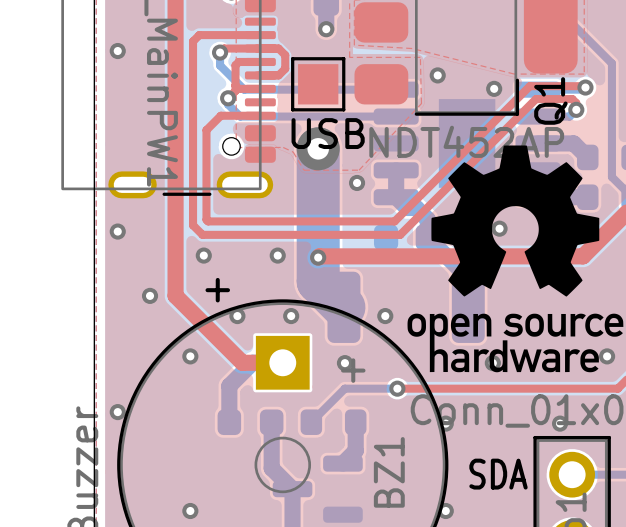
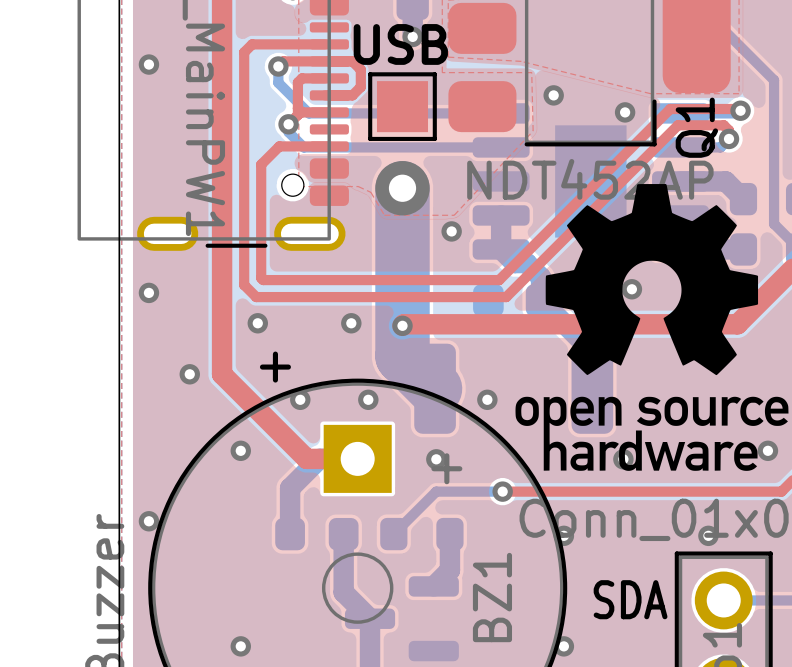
text: none -> USB (400, 44)
USB name: USB (328, 133) -> none

